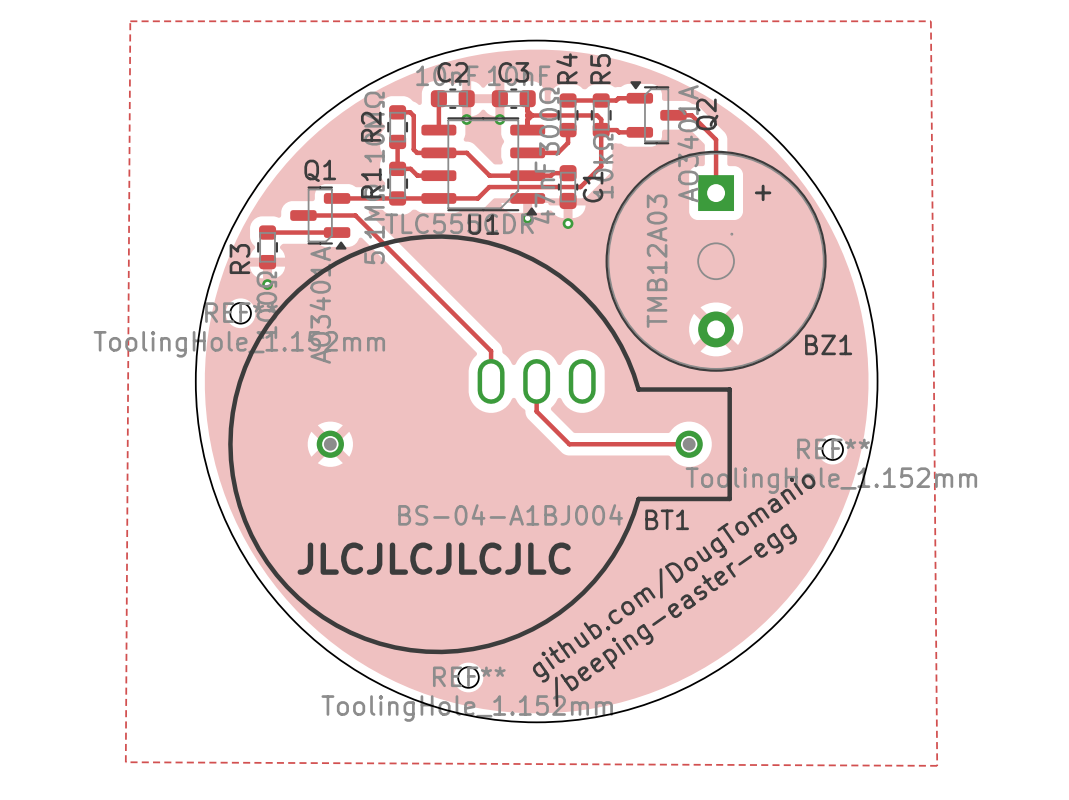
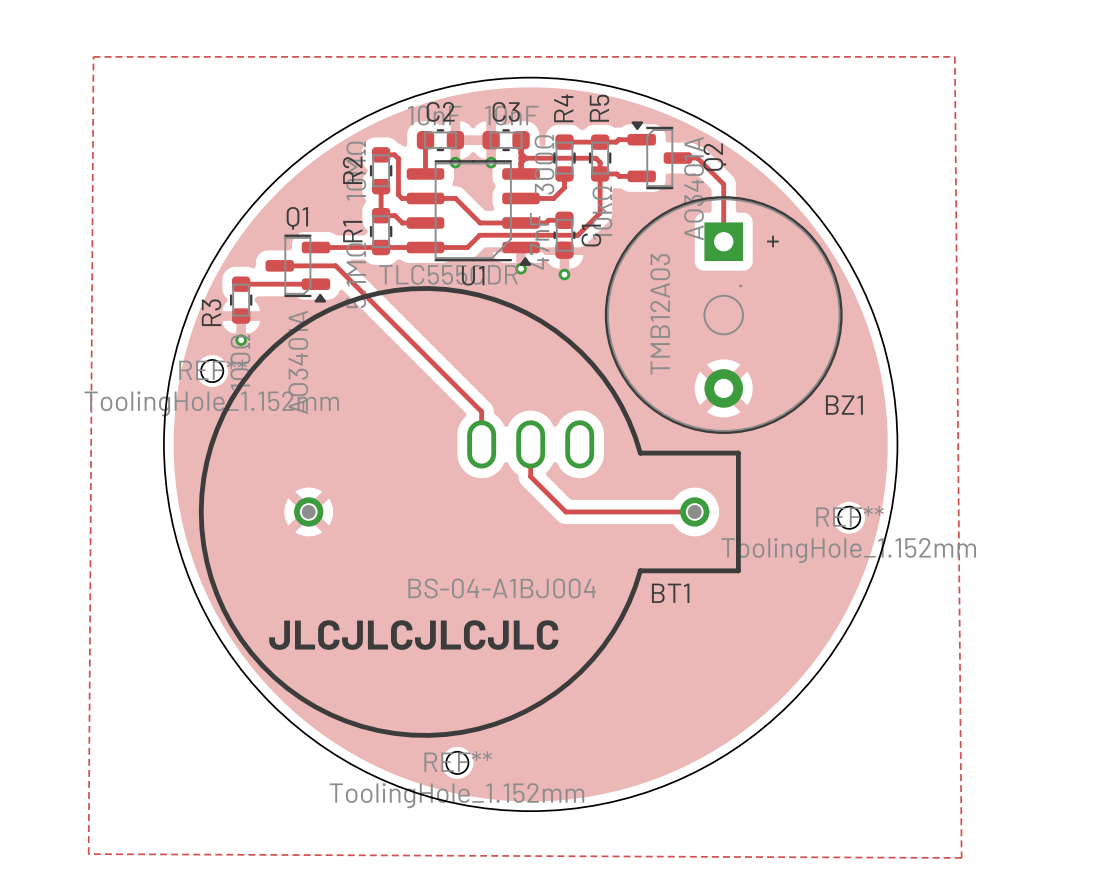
text: github.com/DougTomanio (674, 578) -> none
text: /beeping-easter-egg (676, 615) -> none

